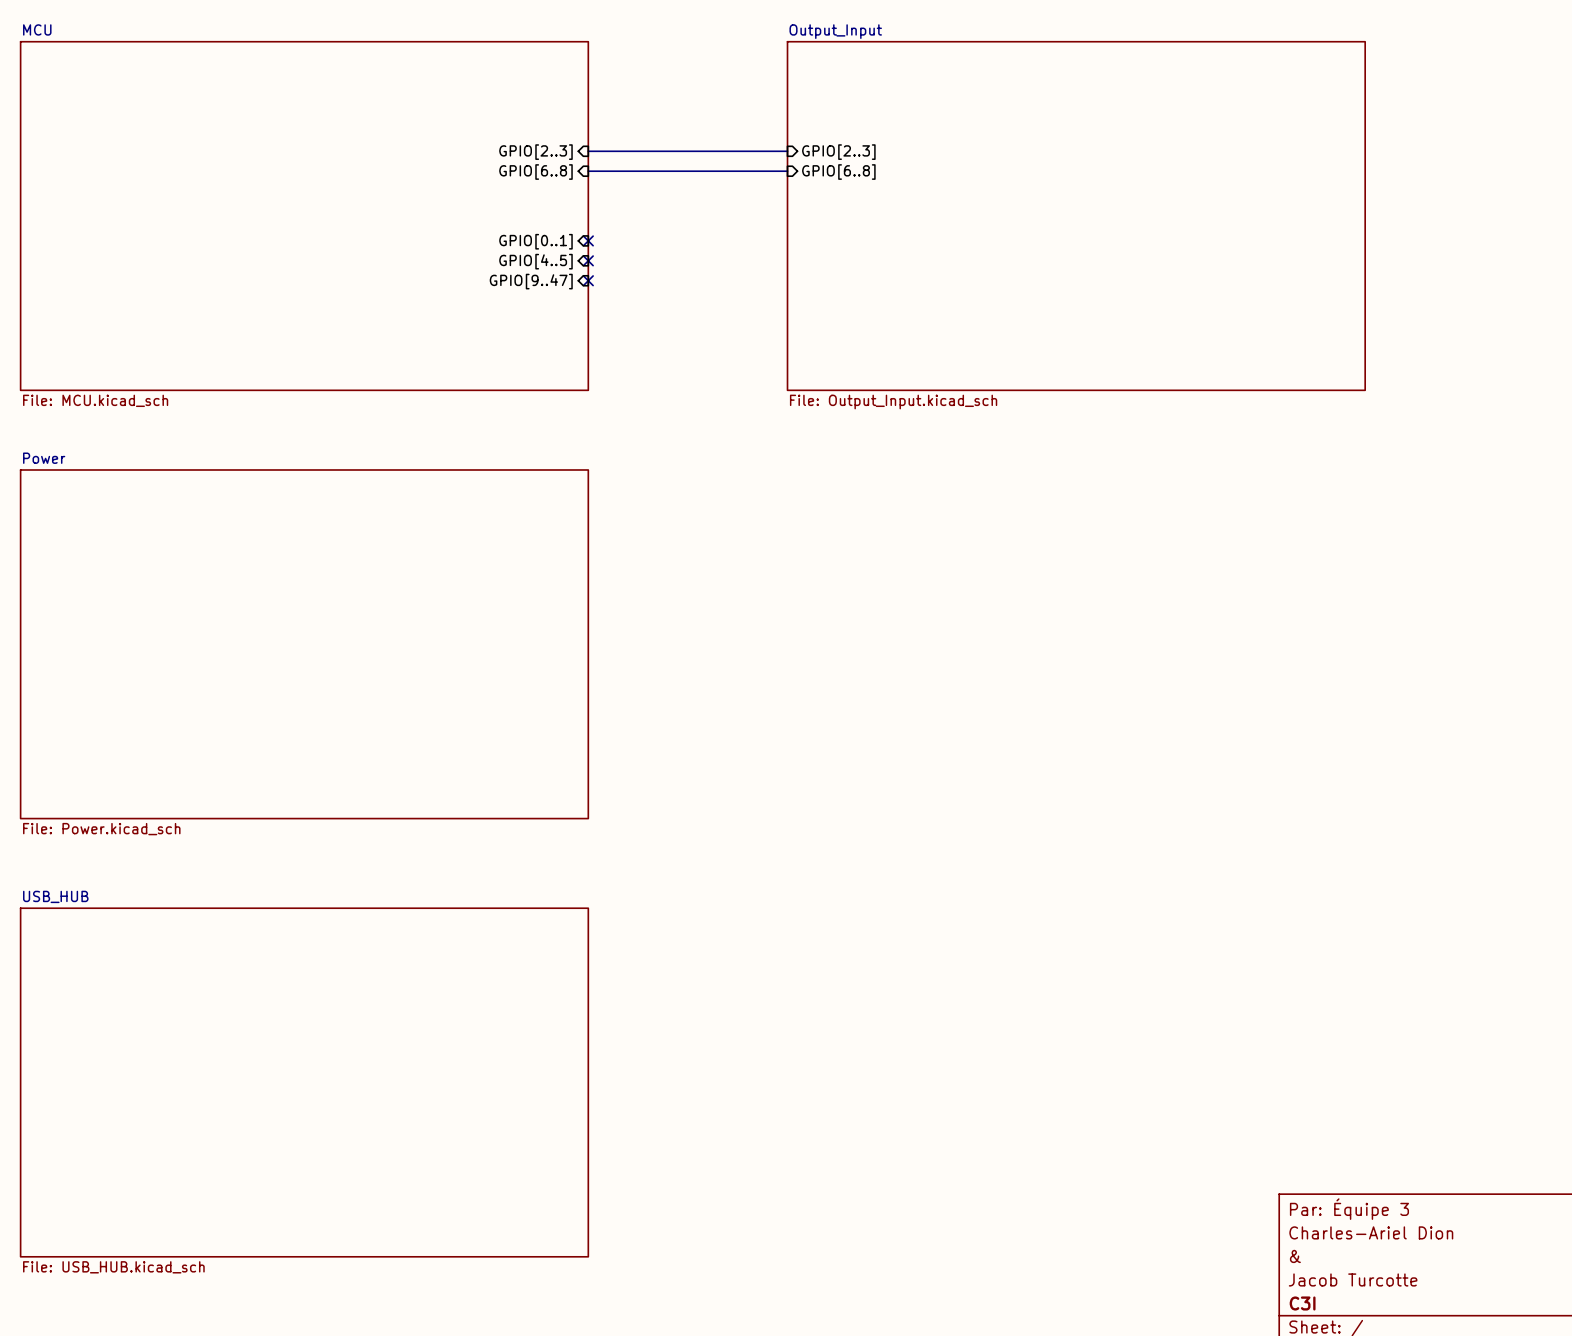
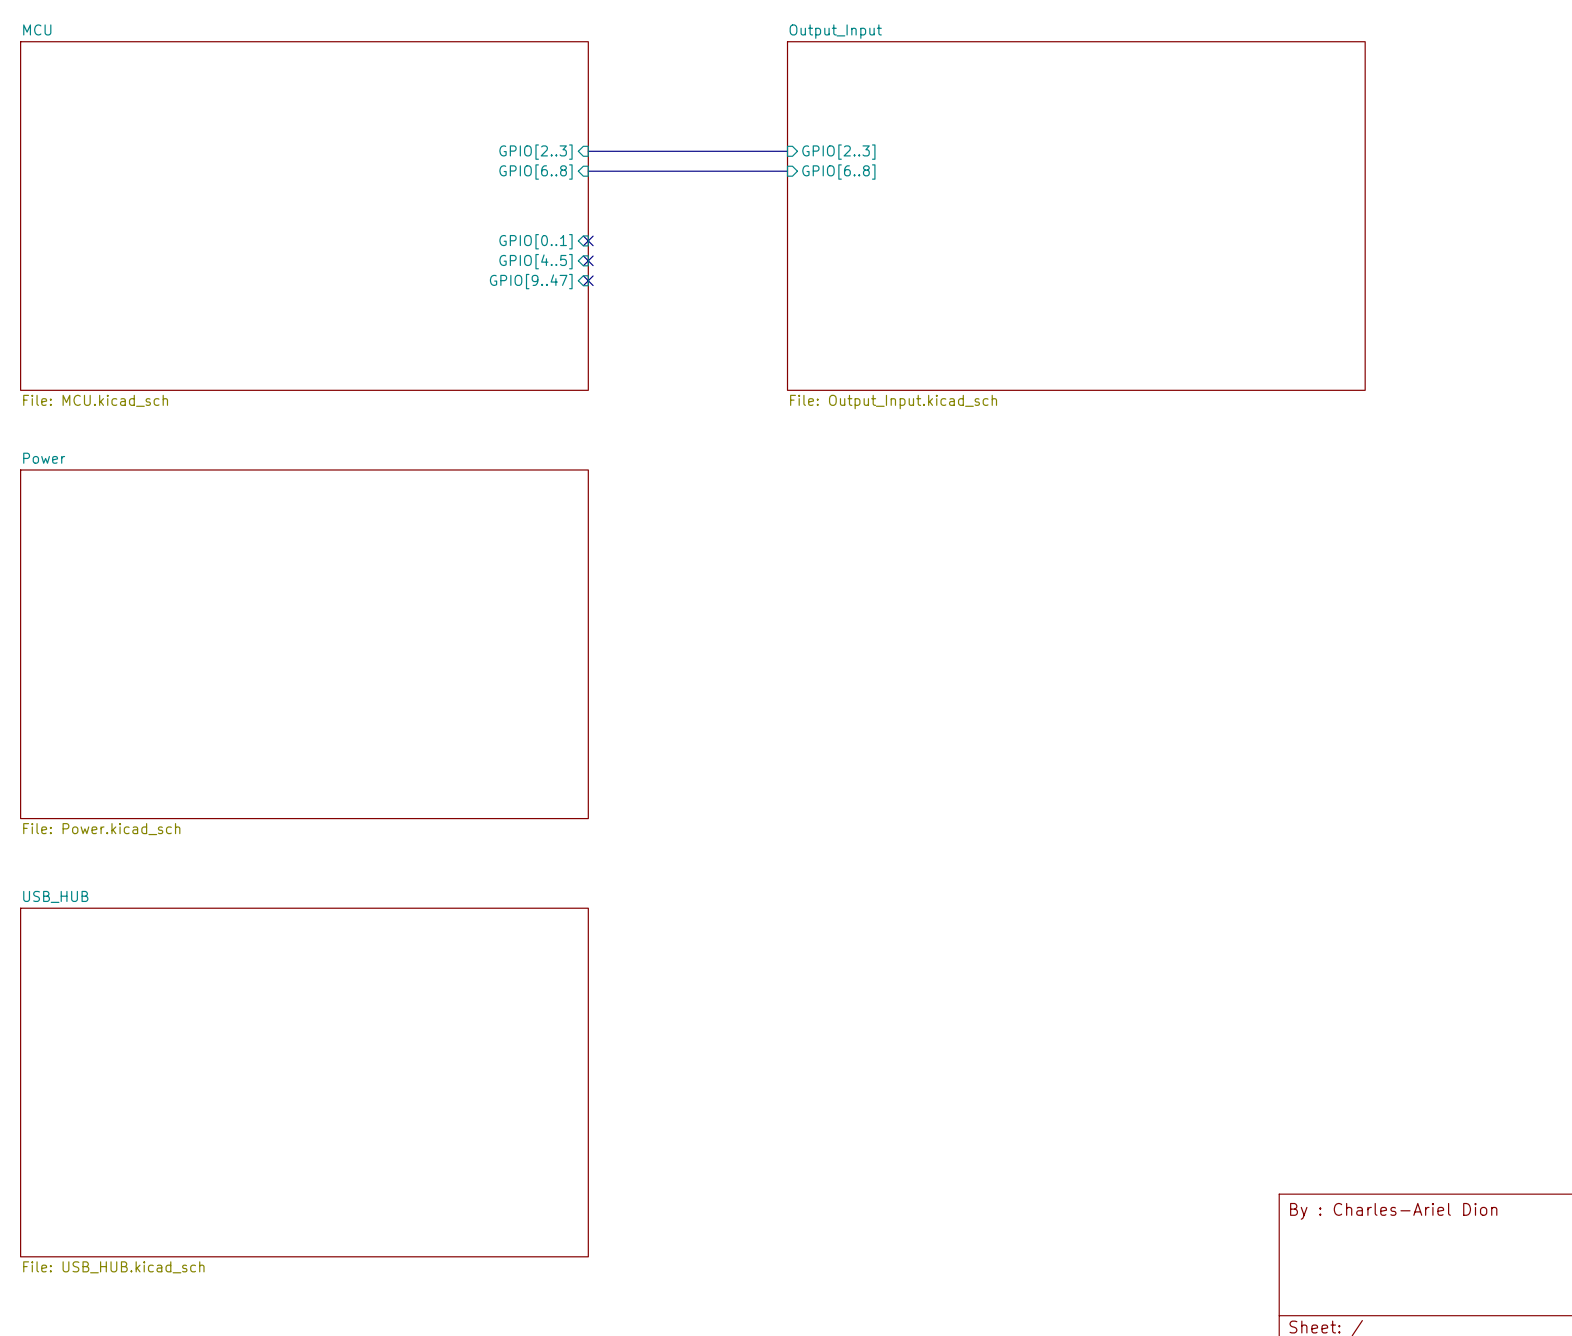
title block: Par: Équipe 3 (1349, 1209) -> By : Charles-Ariel Dion (1393, 1211)
title block: Charles-Ariel Dion (1371, 1232) -> none
title block: & (1295, 1256) -> none
title block: Jacob Turcotte (1353, 1279) -> none
title block: C3I (1302, 1303) -> none

